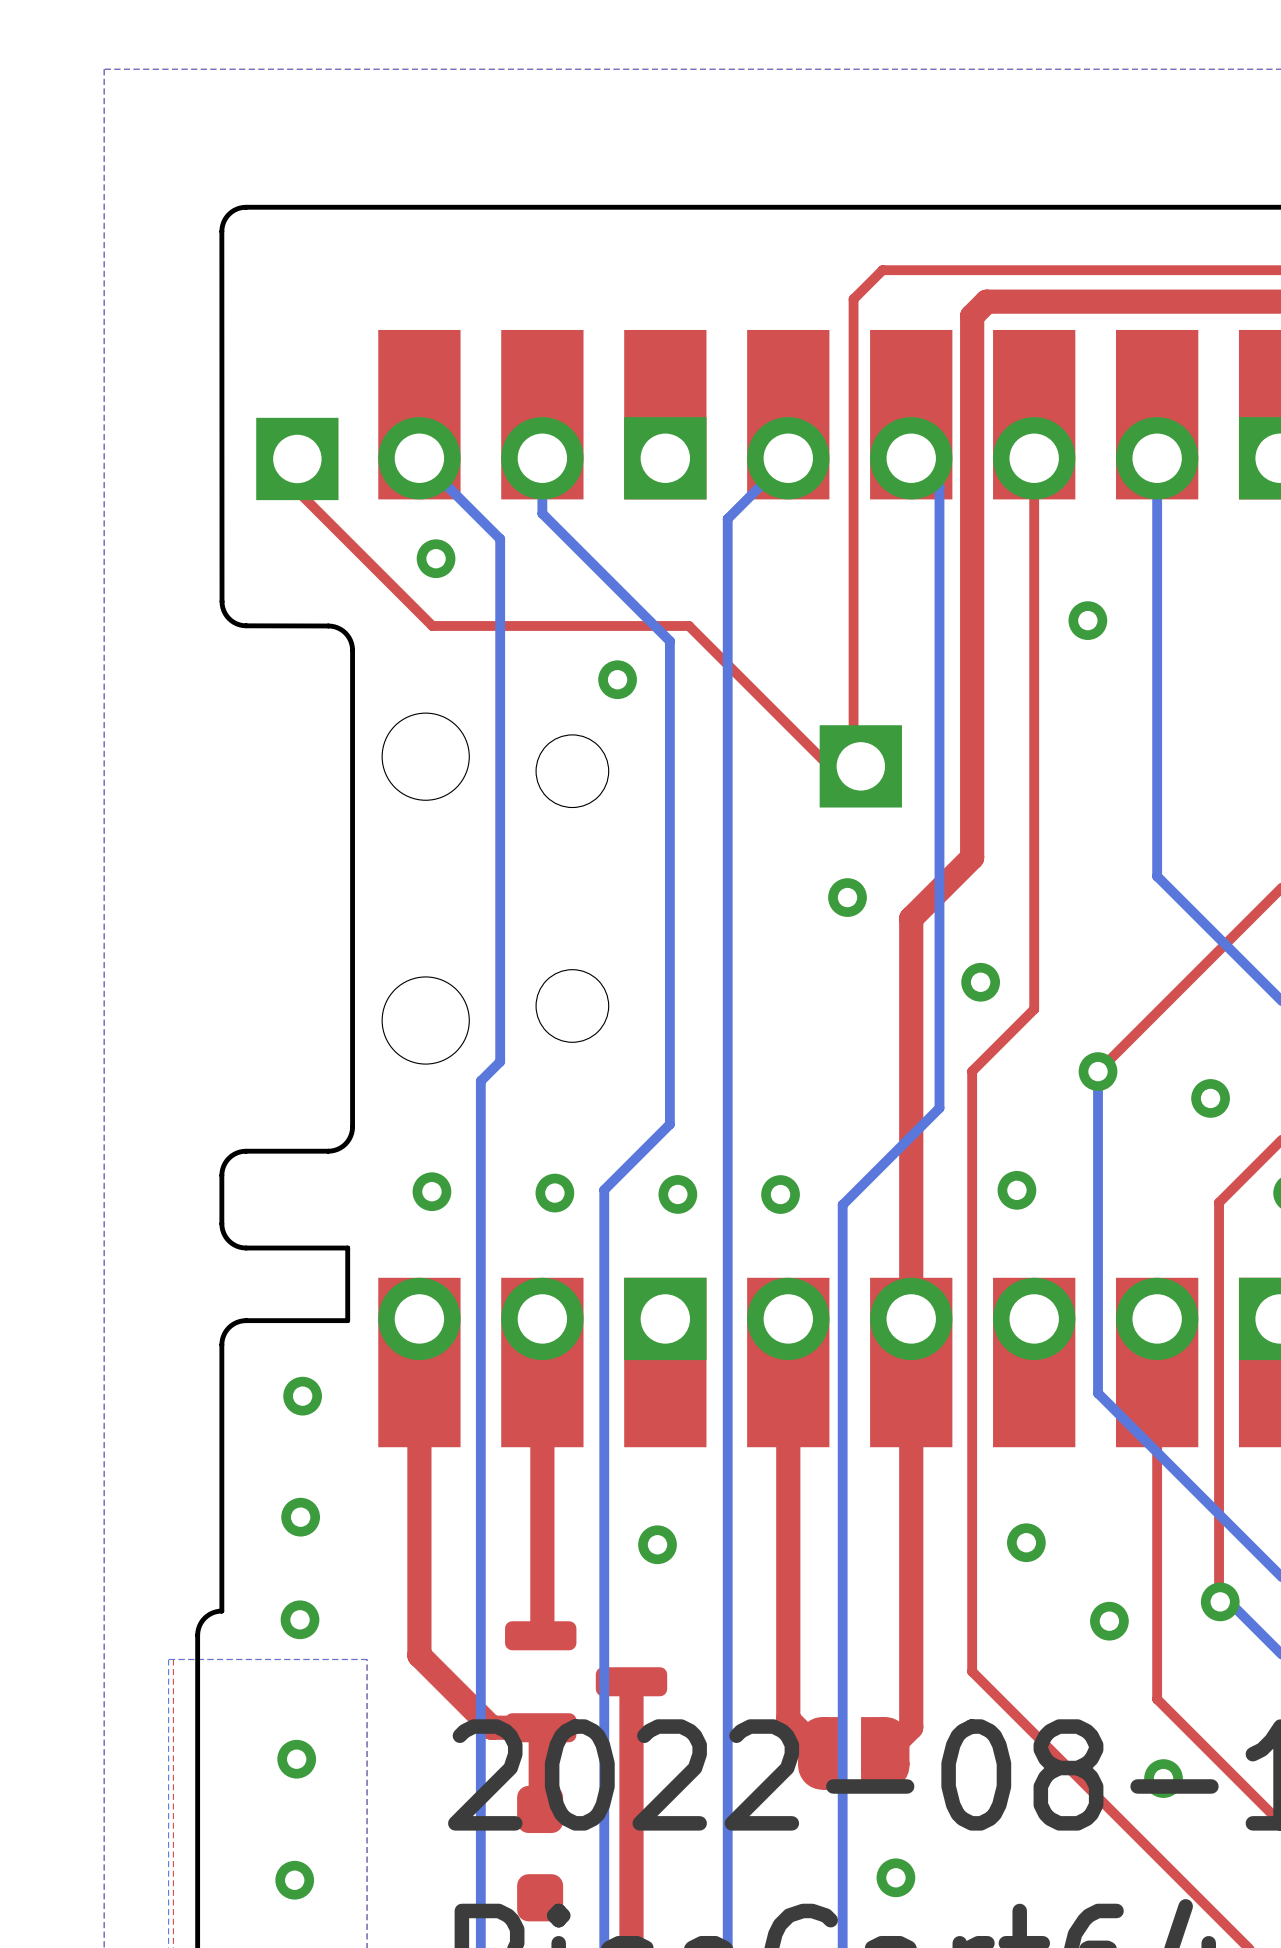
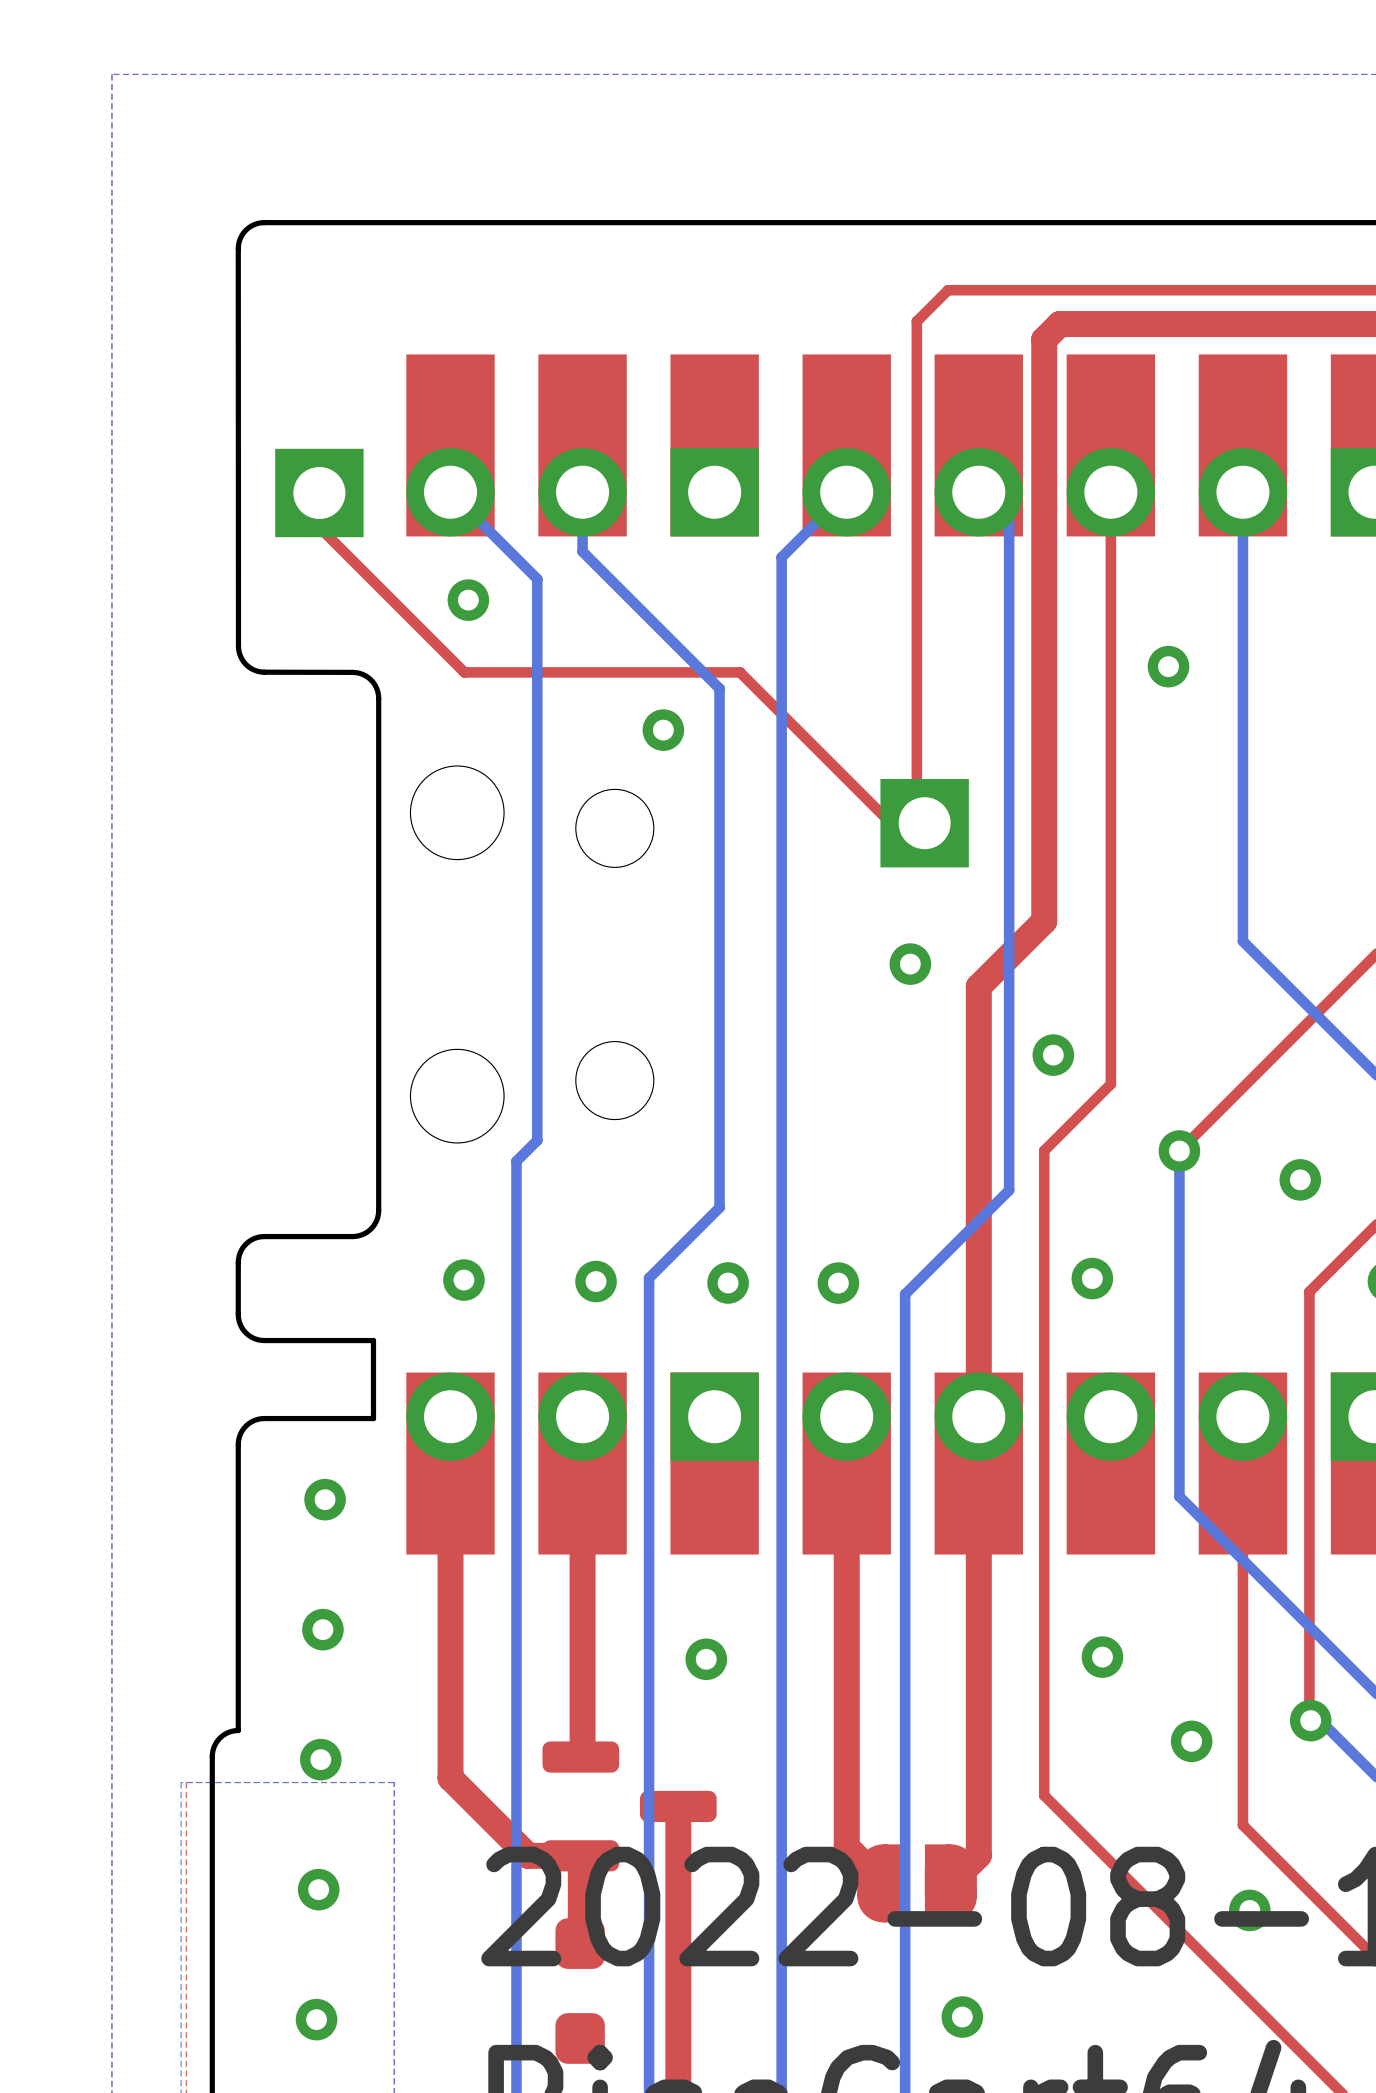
via position: (300, 1619) -> (320, 1759)

